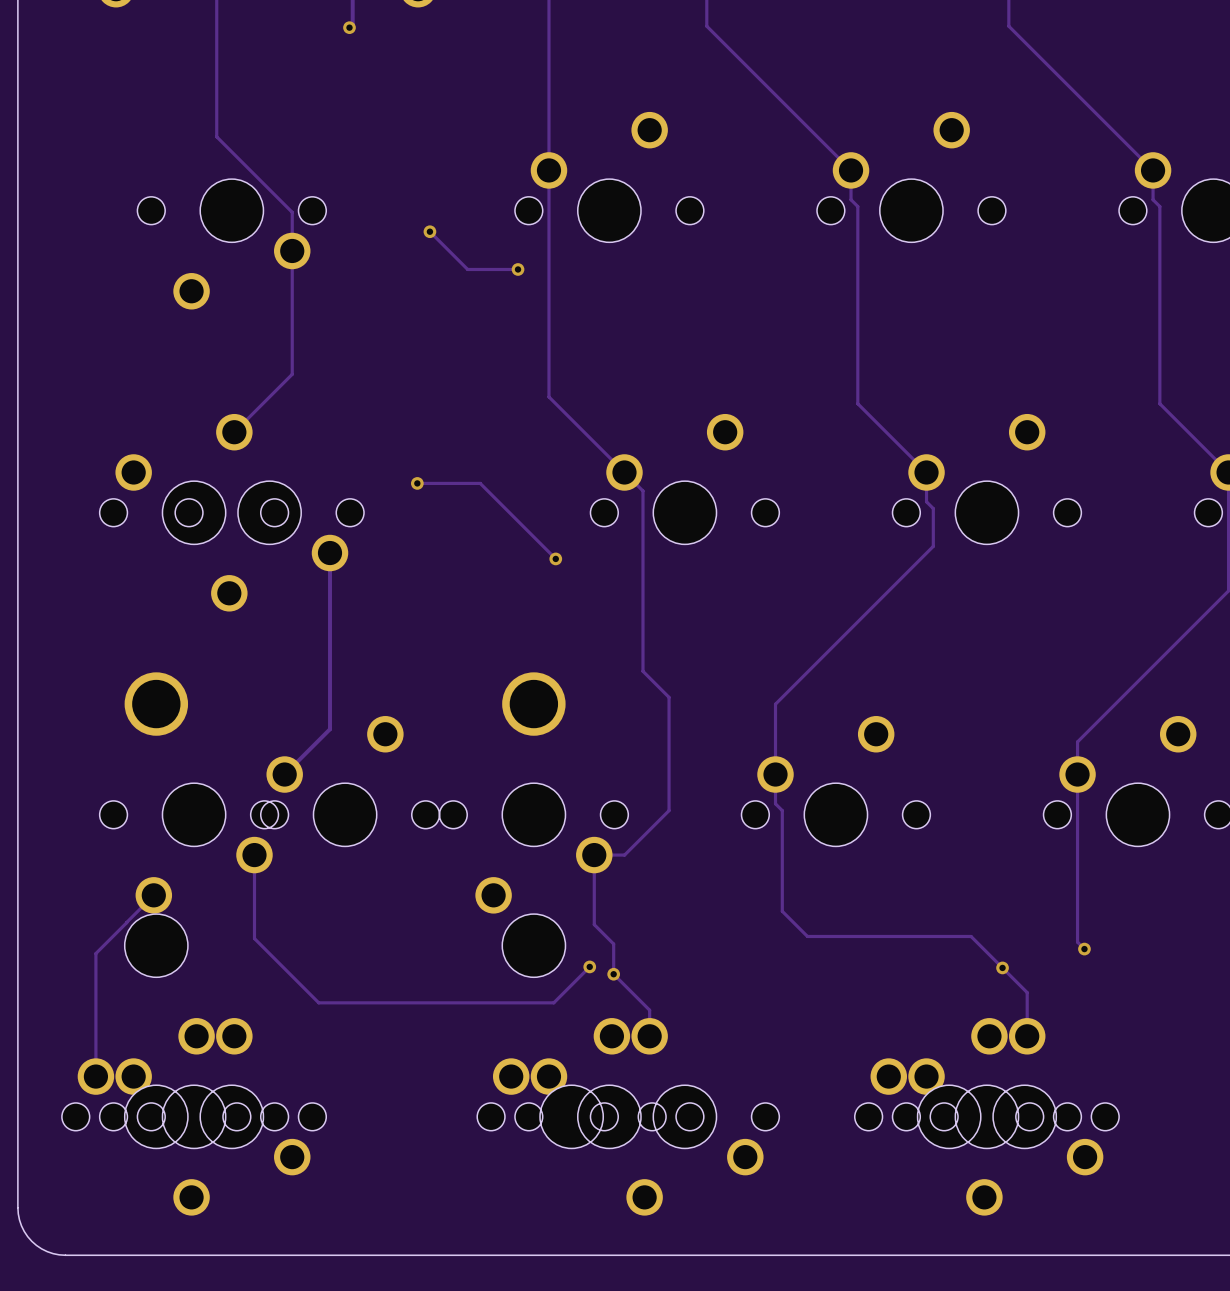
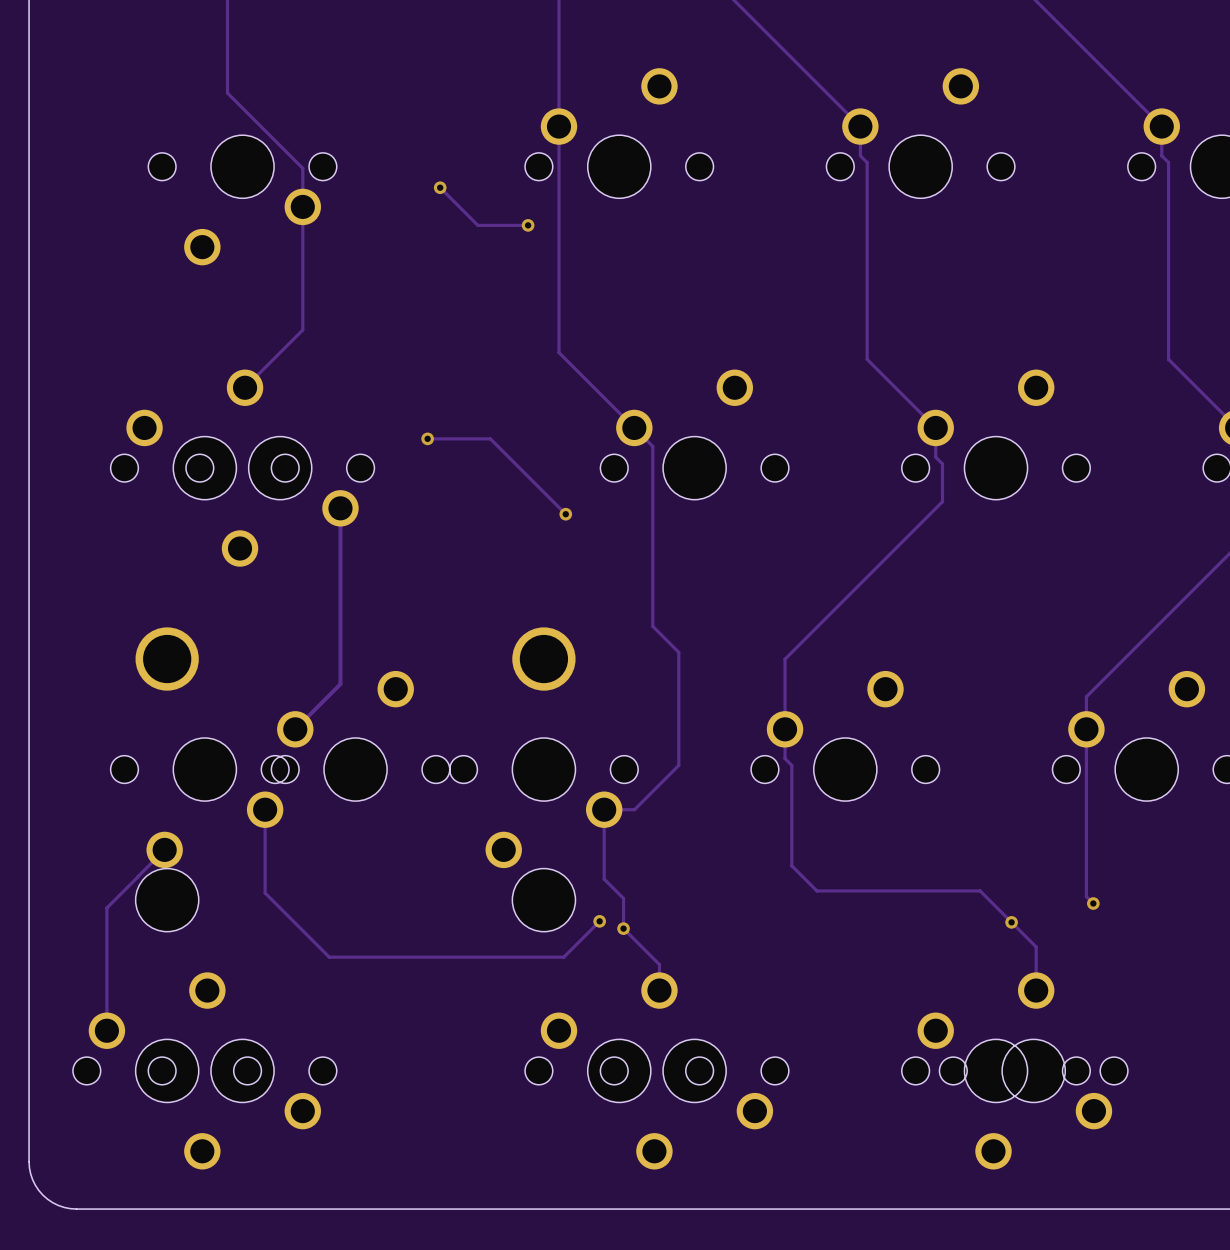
part: (194, 1083) -> none
part: (571, 1083) -> none
part: (949, 1083) -> none

